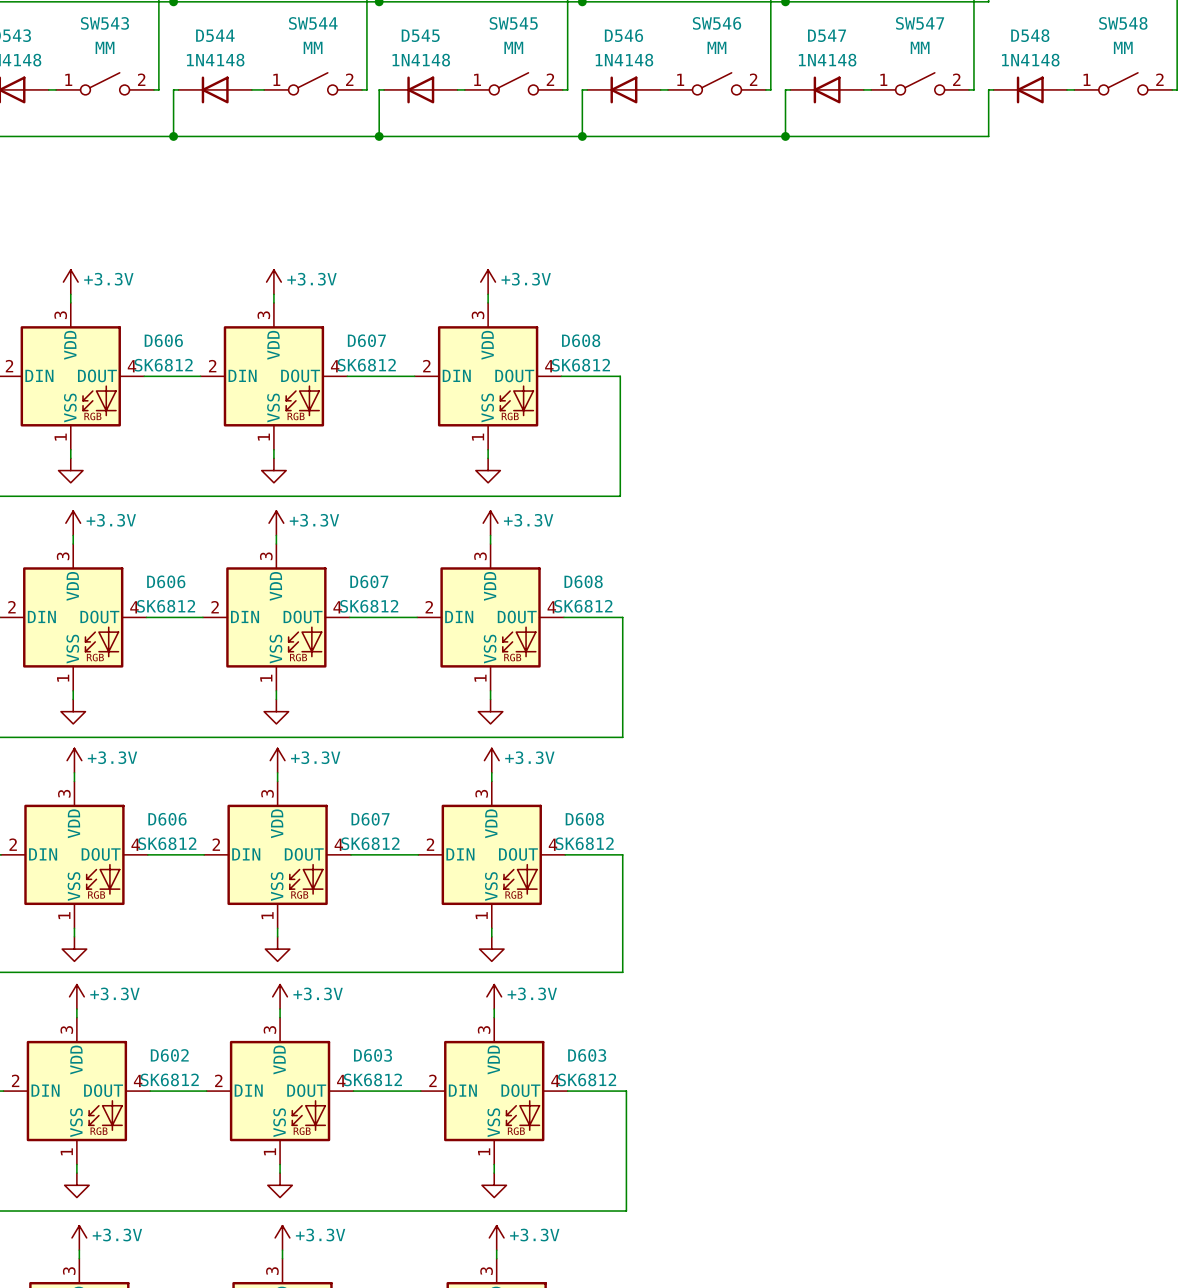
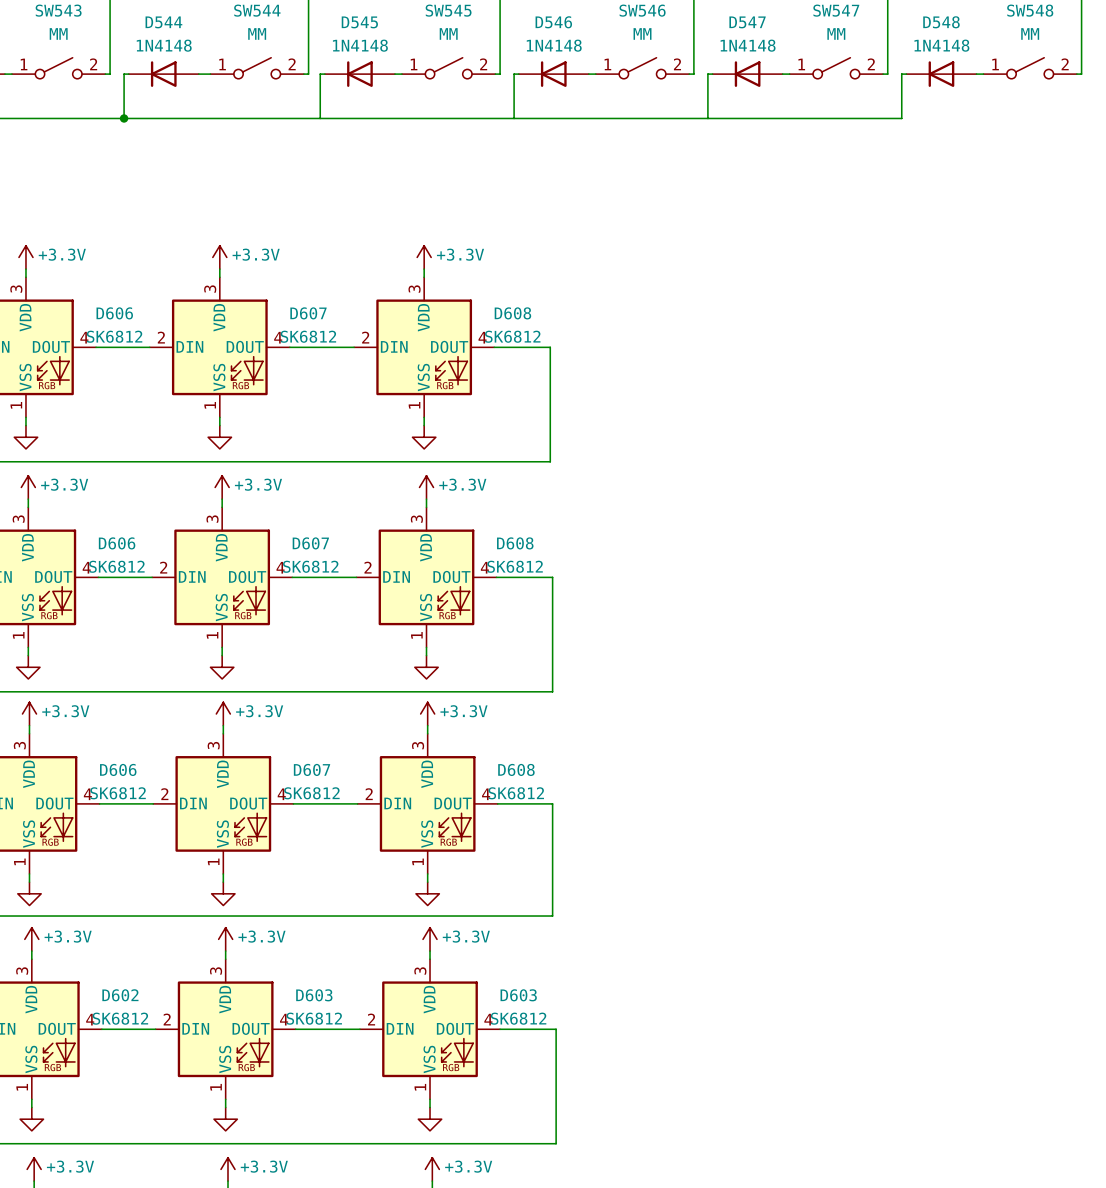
junction: (379, 136) -> none
junction: (582, 136) -> none
junction: (785, 136) -> none

